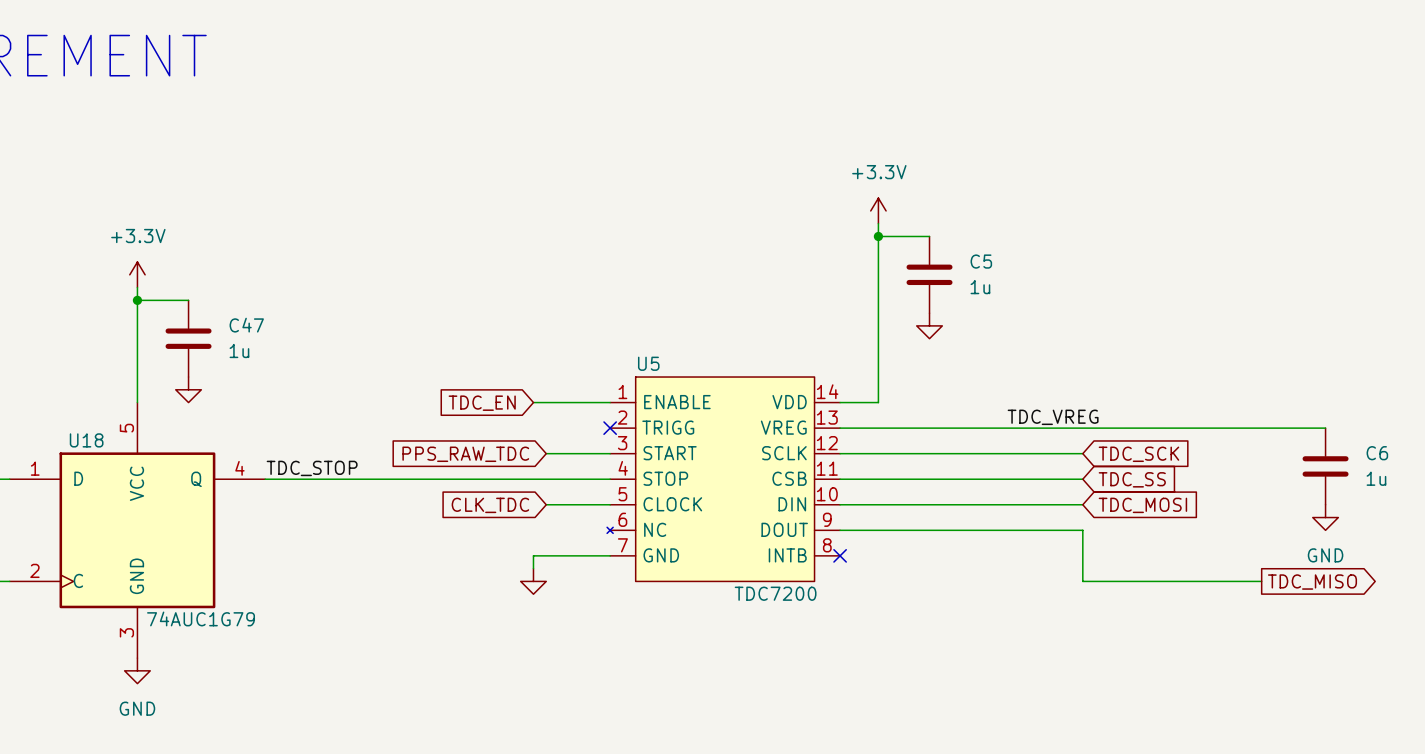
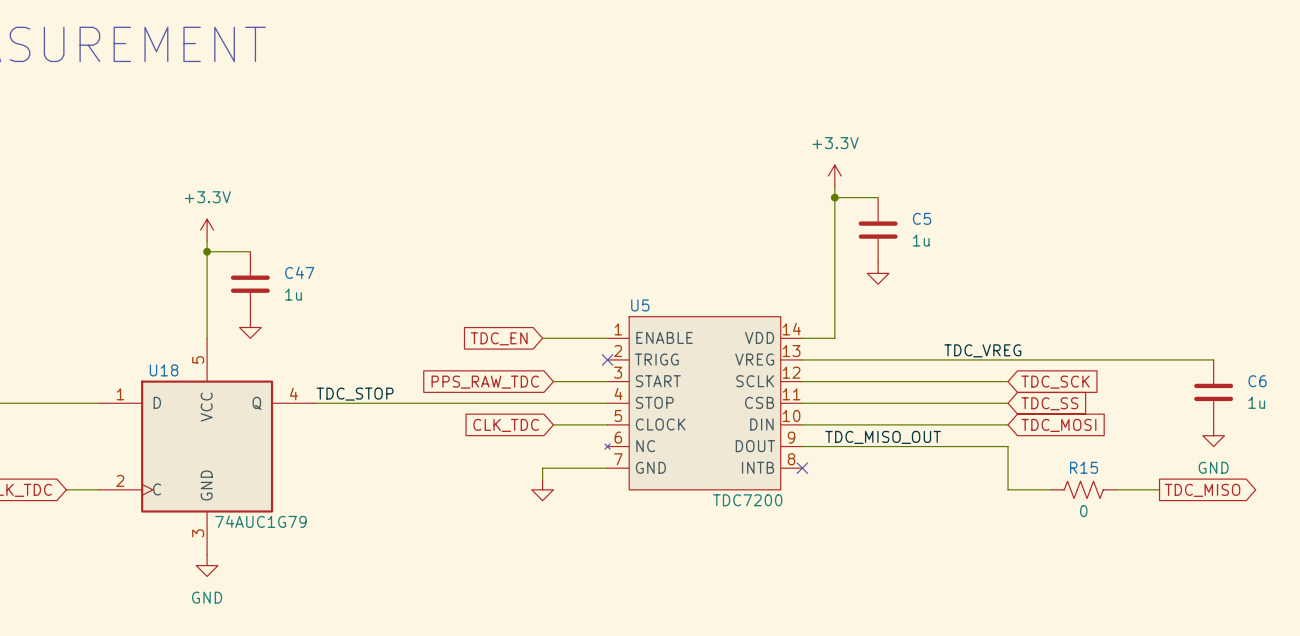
label: none -> TDC_MISO_OUT (883, 437)
R15: none -> 0 (1083, 489)

